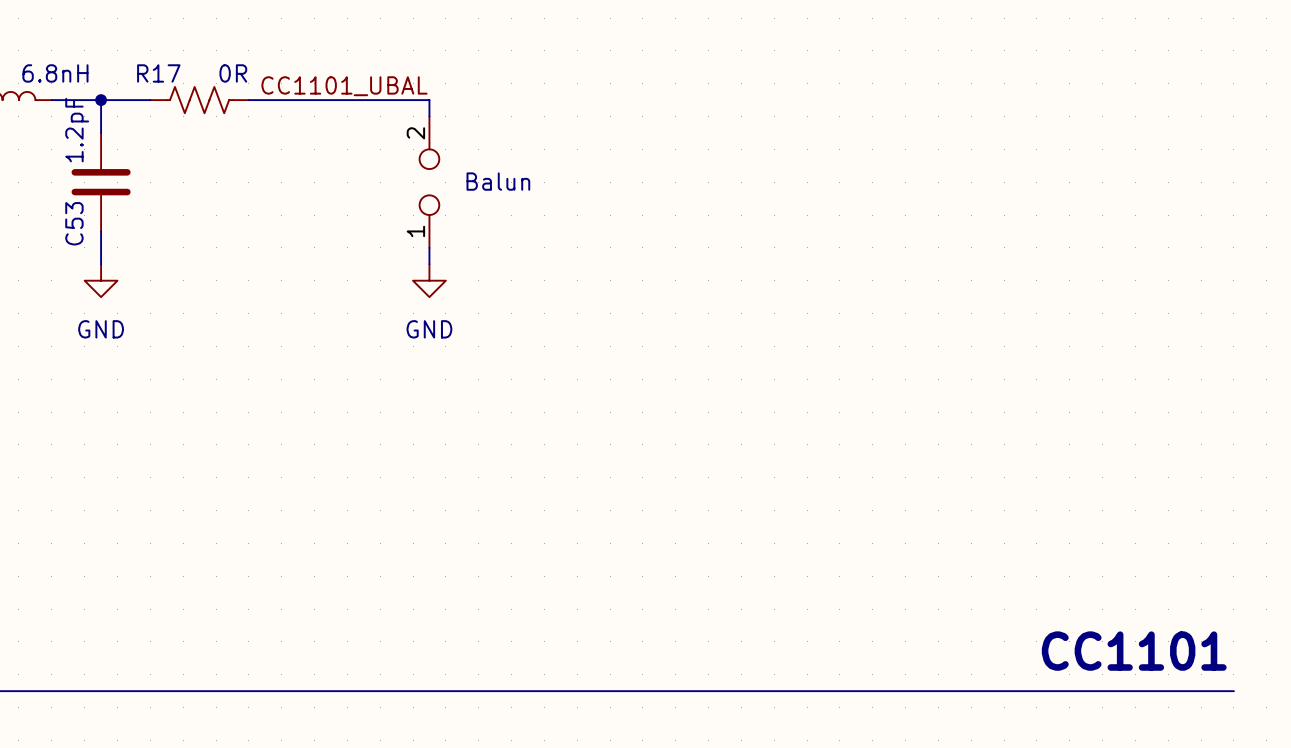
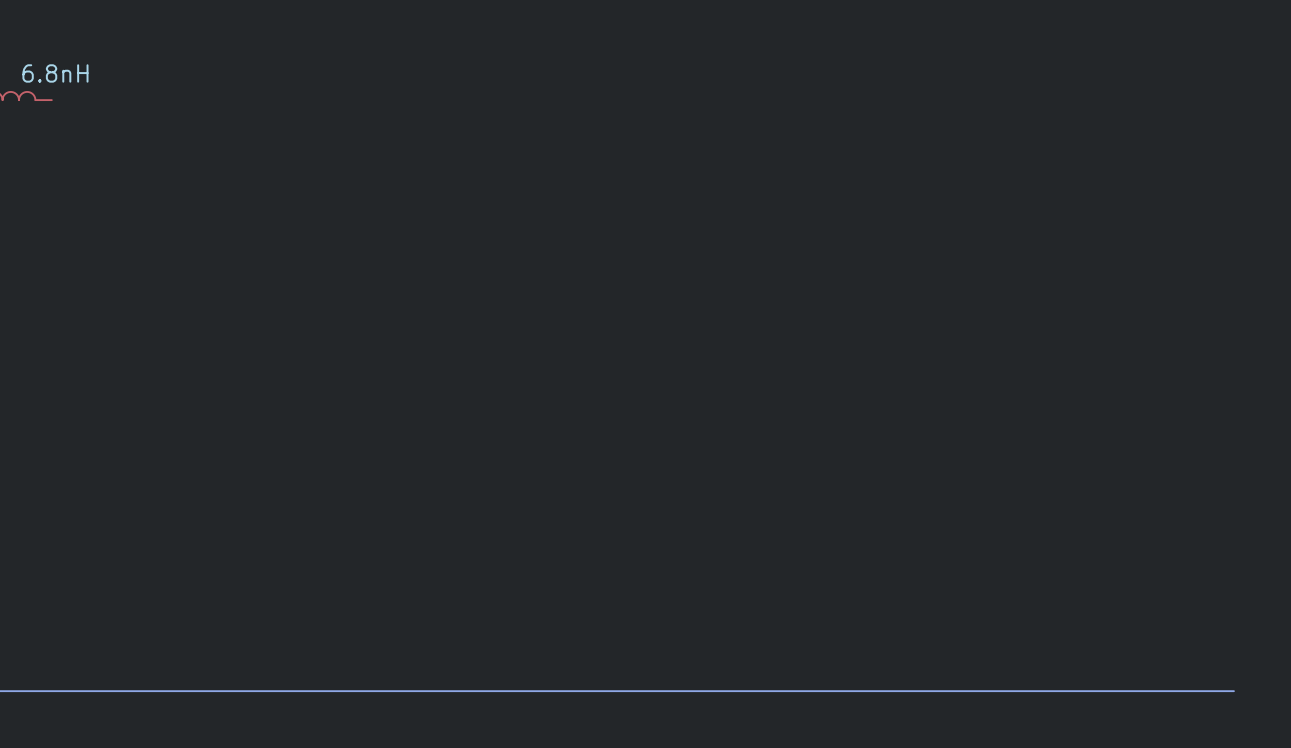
label: CC1101_UBAL (344, 86) -> none
wire: (51, 100) (150, 100) -> none
wire: (101, 100) (101, 132) -> none
junction: (101, 100) -> none
R17: 0R (199, 100) -> none
wire: (248, 100) (429, 100) (429, 116) -> none
C53: 1.2pF (101, 182) -> none
part: Balun (429, 182) -> none
wire: (101, 231) (101, 264) -> none
wire: (429, 247) (429, 264) -> none
power symbol: GND (101, 280) -> none
power symbol: GND (429, 280) -> none
text: CC1101 (1134, 651) -> none

